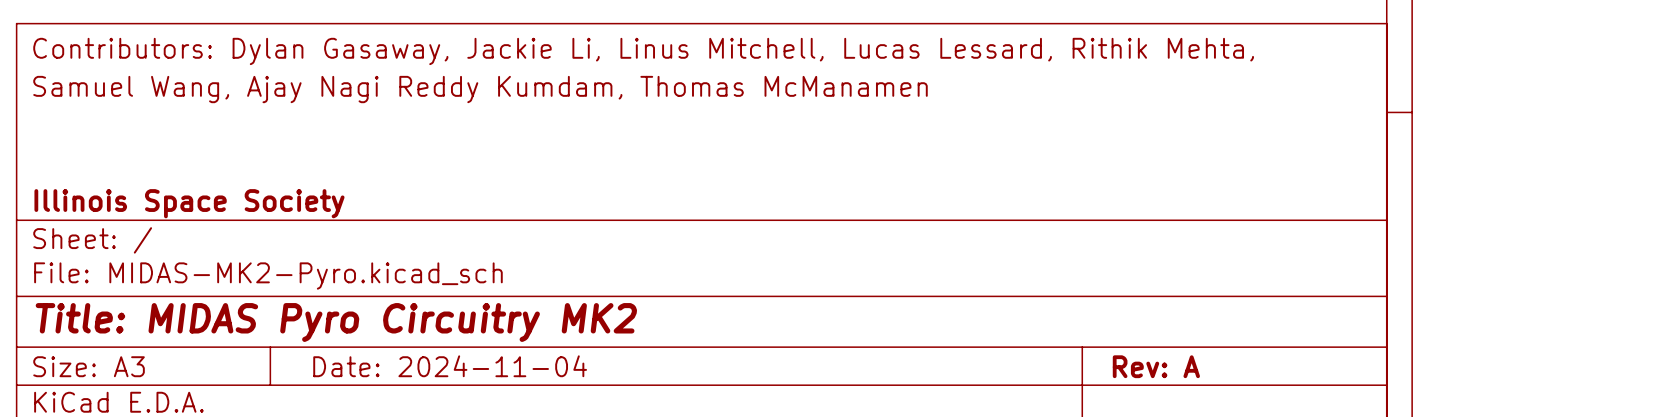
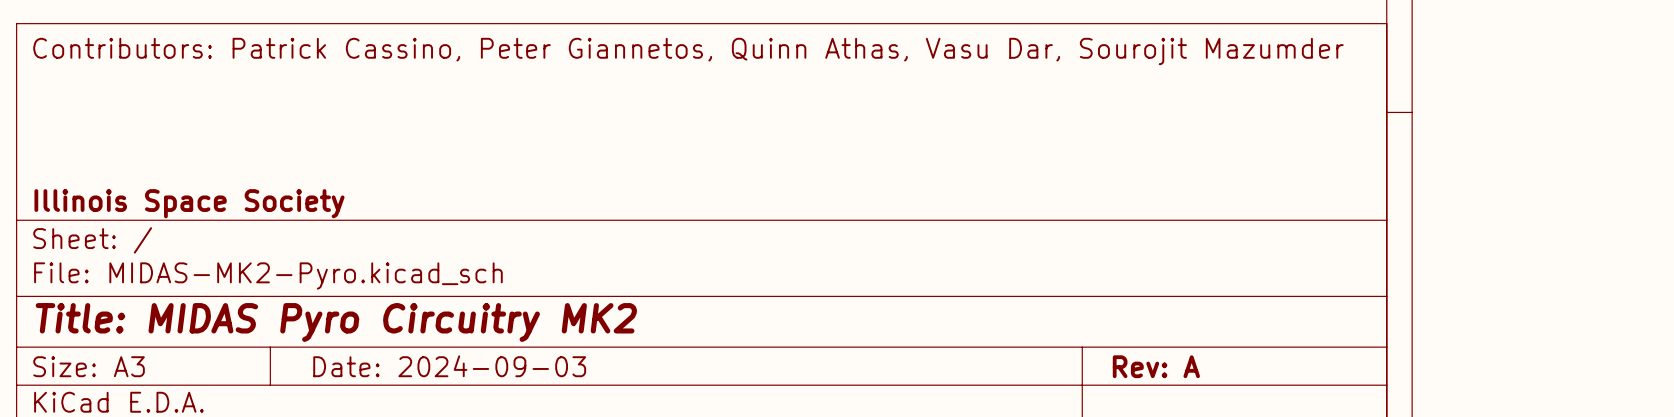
title block: Contributors: Dylan Gasaway, Jackie Li, Linus Mitchell, Lucas Lessard, Rithik Mehta, (643, 51) -> Contributors: Patrick Cassino, Peter Giannetos, Quinn Athas, Vasu Dar, Sourojit Mazumder (688, 51)
title block: Samuel Wang, Ajay Nagi Reddy Kumdam, Thomas McManamen (480, 89) -> none
title block: Date: 2024-11-04 (450, 366) -> Date: 2024-09-03 (449, 366)

